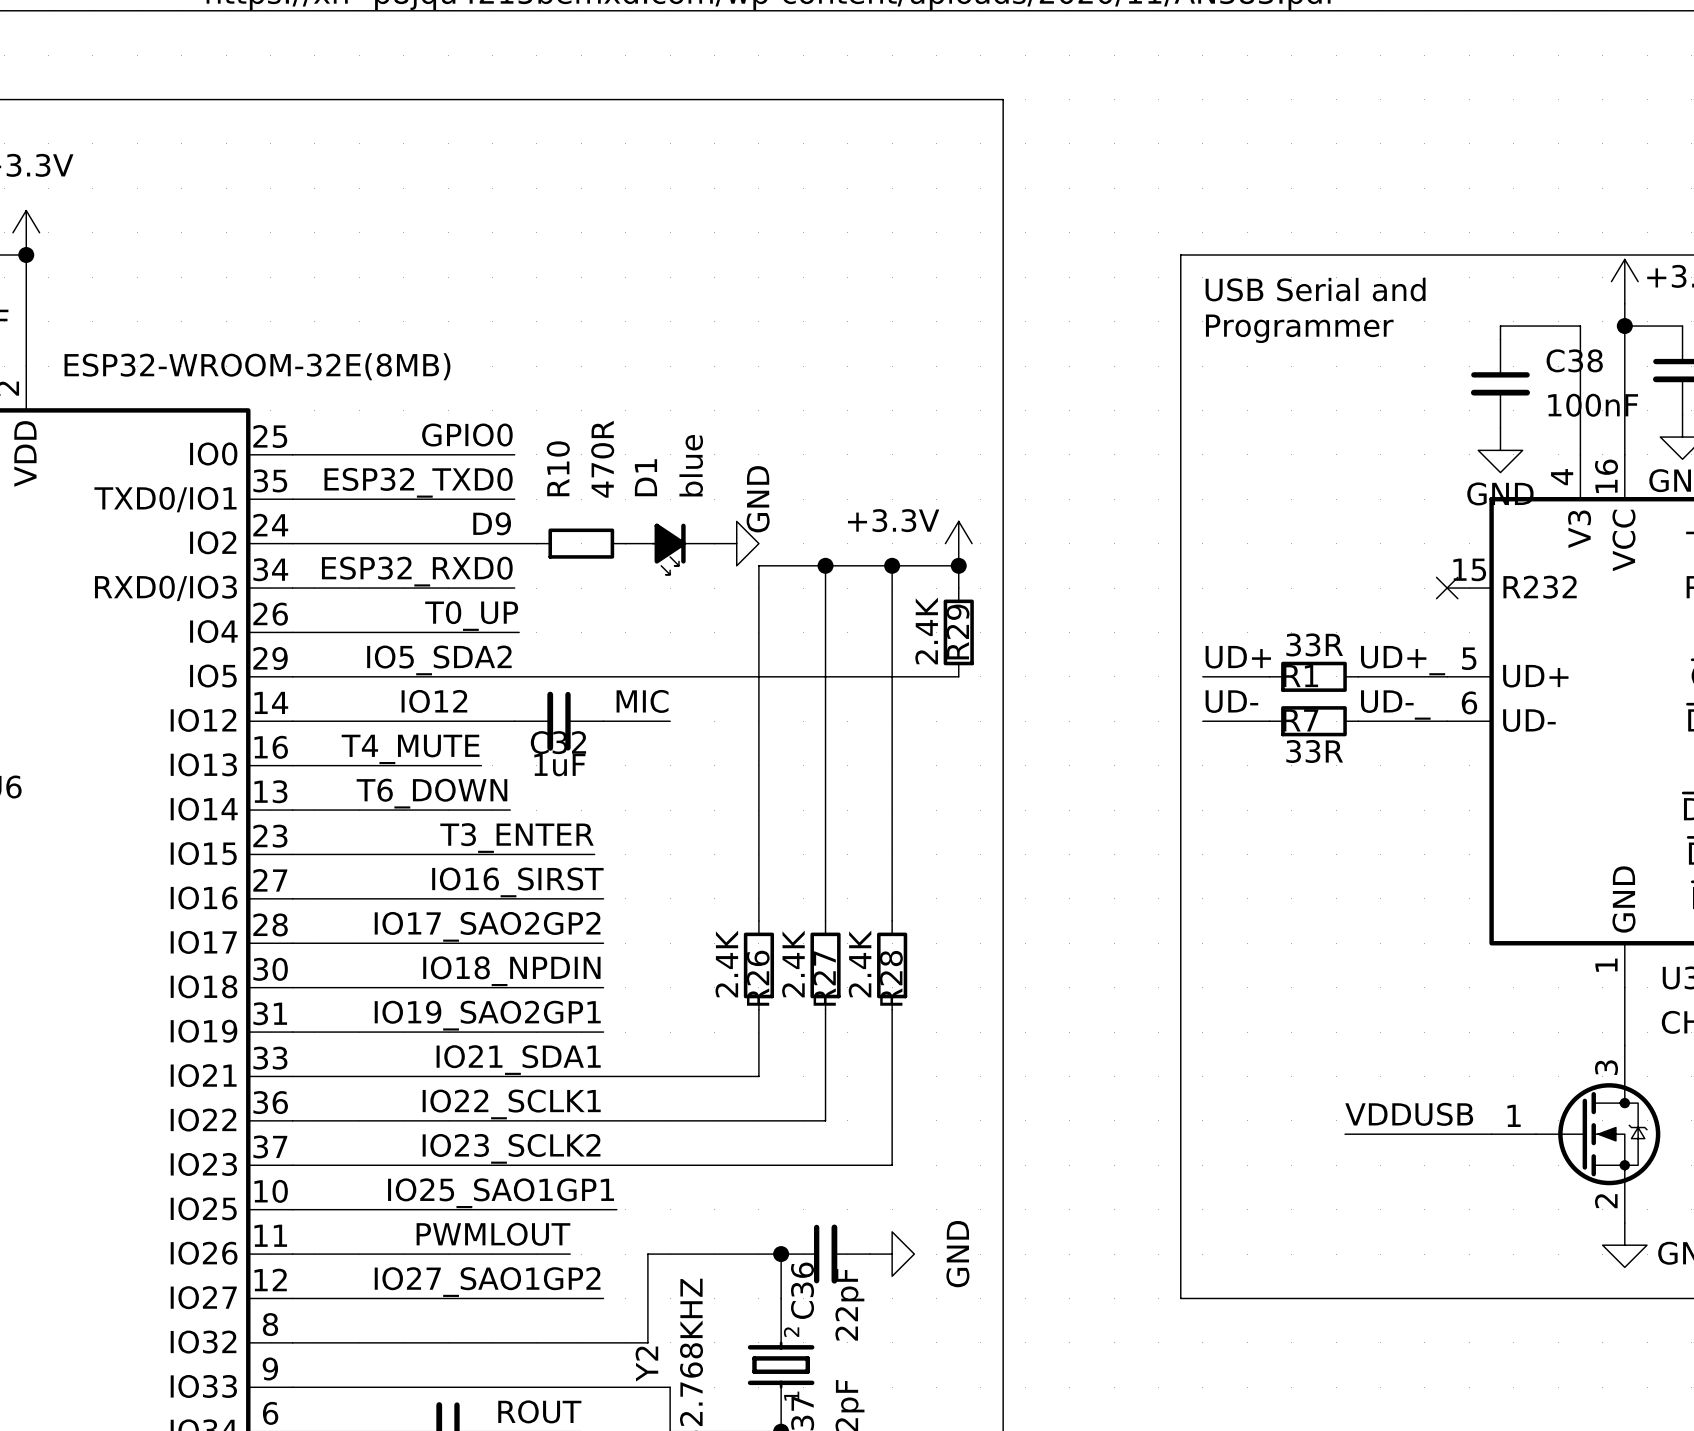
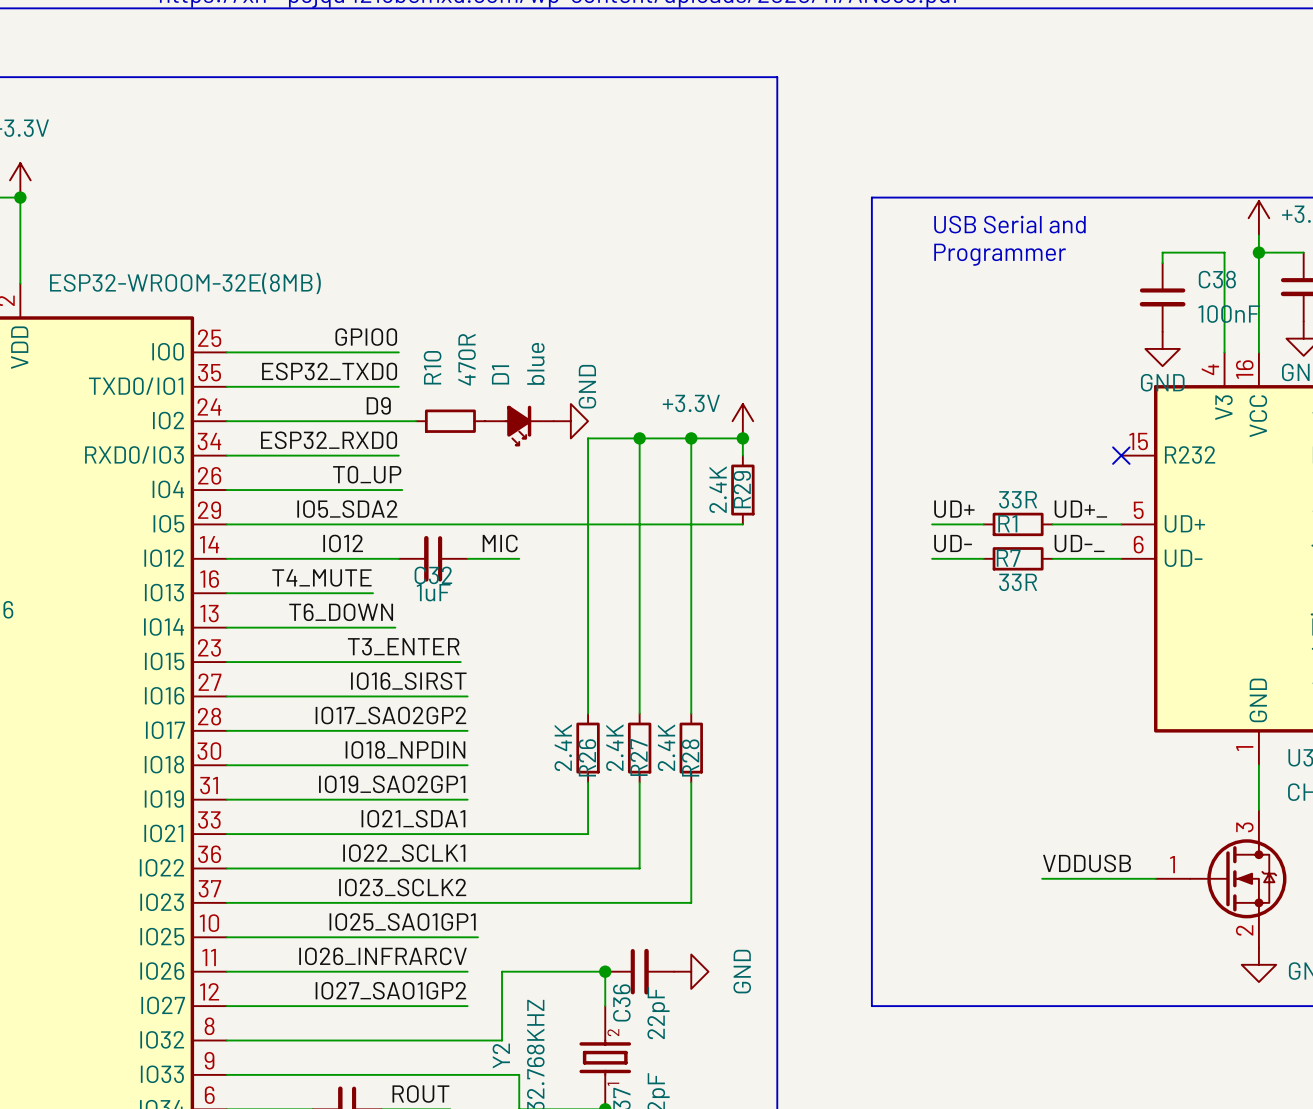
line: (1180, 254) (1180, 1298) -> (914, 197) (871, 197) (871, 1006) (914, 1006)
label: PWMLOUT (493, 1234) -> none
label: none -> IO26_INFRARCV (383, 956)
wire: none -> (441, 971) (467, 971)

